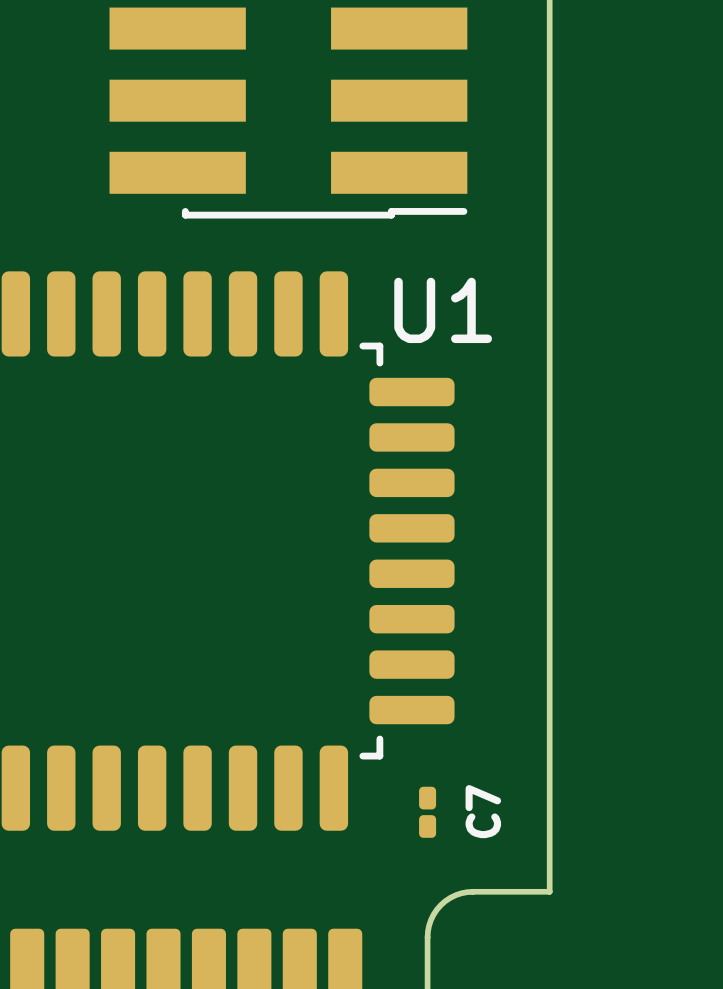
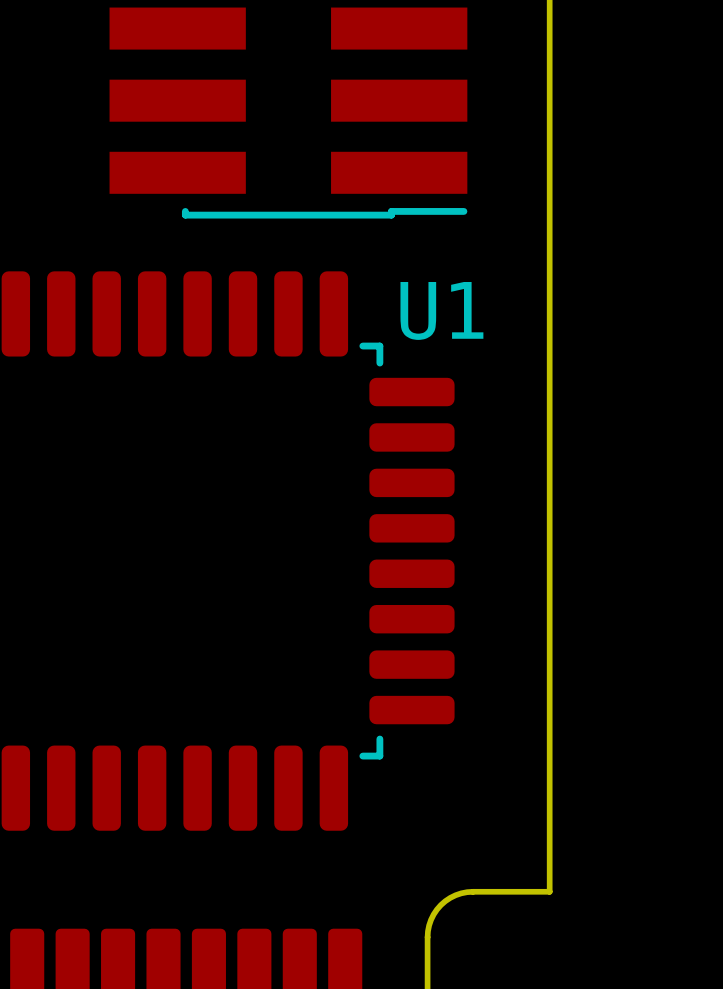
C7: (427, 812) -> none

